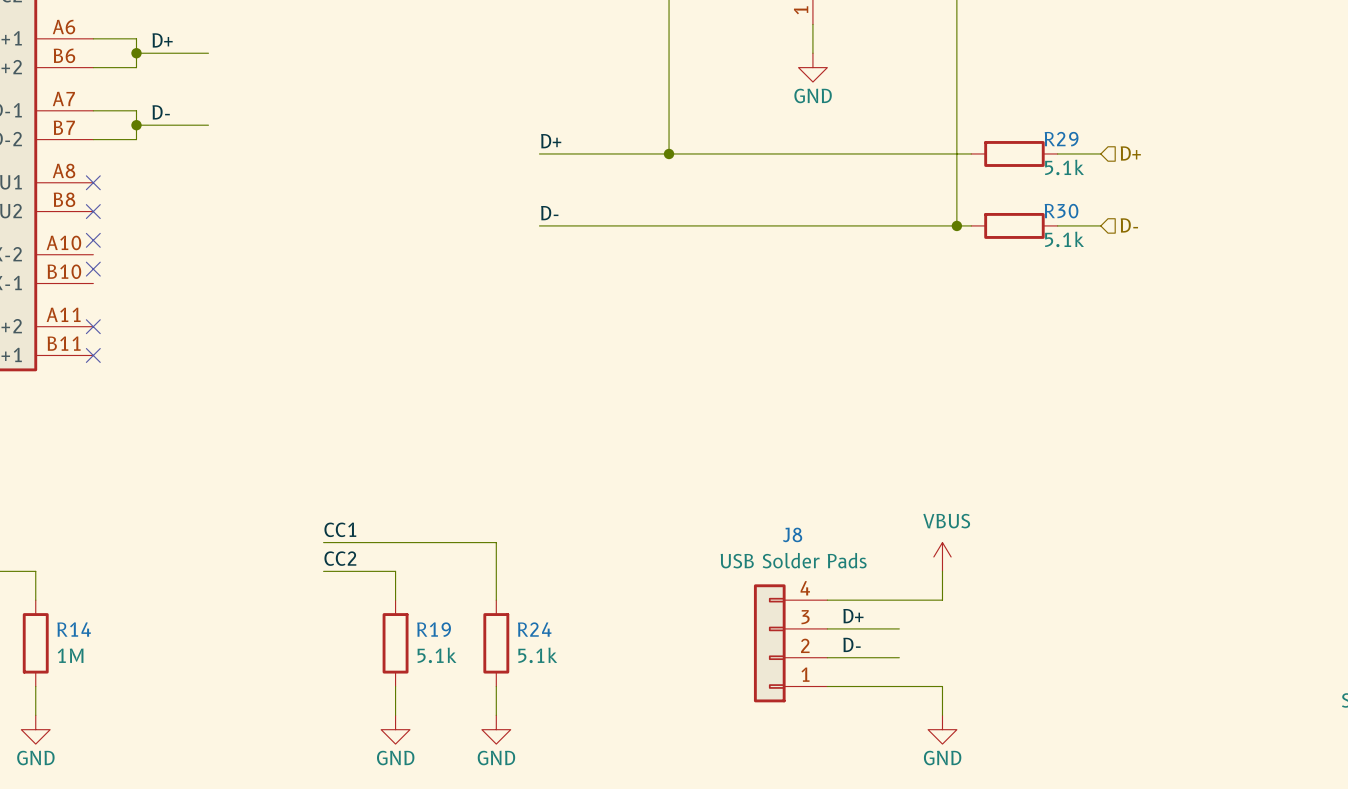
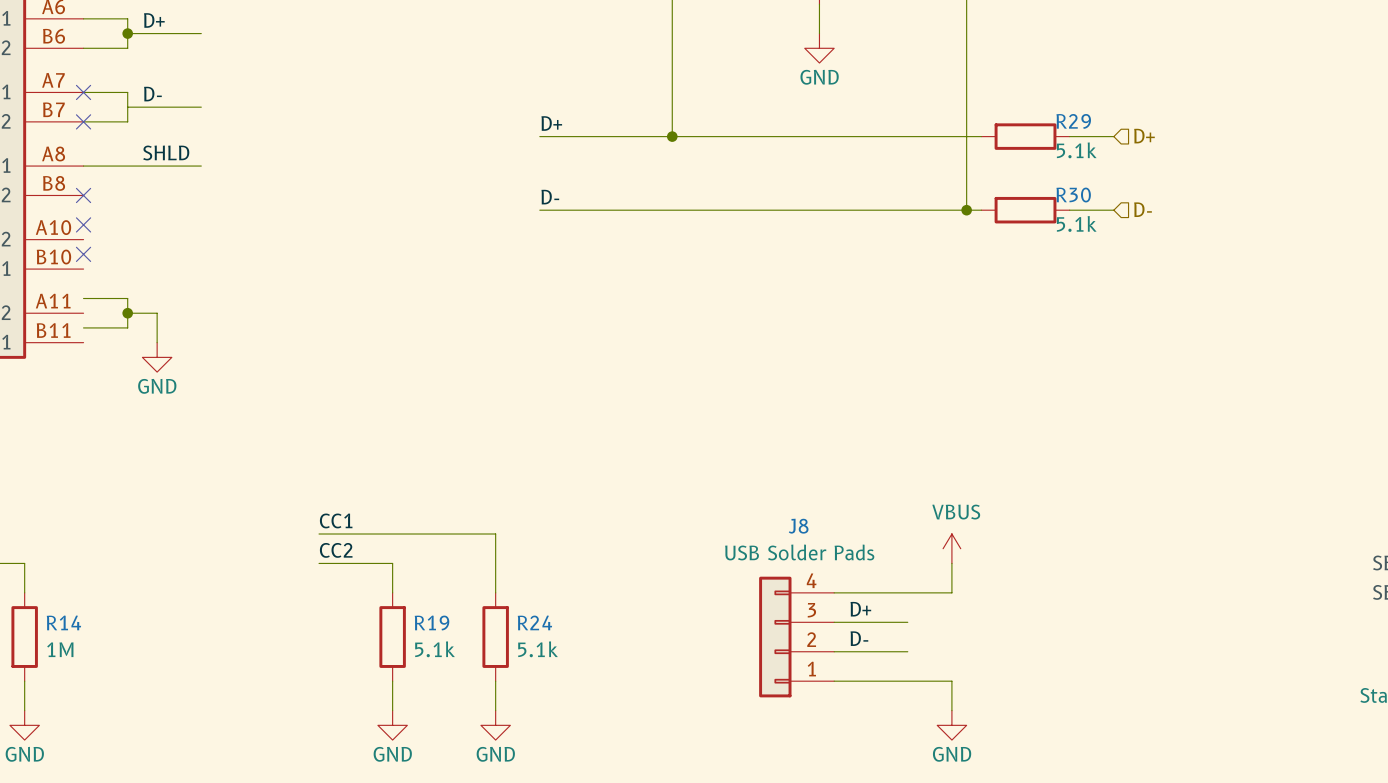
no-connect mark: none -> (83, 92)
junction: (136, 125) -> none
no-connect mark: none -> (83, 121)
label: none -> SHLD (166, 152)
wire: none -> (83, 166) (201, 166)
no-connect mark: (93, 182) -> none
wire: none -> (83, 298) (127, 298) (127, 327) (83, 327)
no-connect mark: (93, 326) -> none
wire: none -> (127, 313) (157, 313) (157, 342)
junction: none -> (127, 313)
no-connect mark: (93, 355) -> none
power symbol: none -> GND (157, 357)

